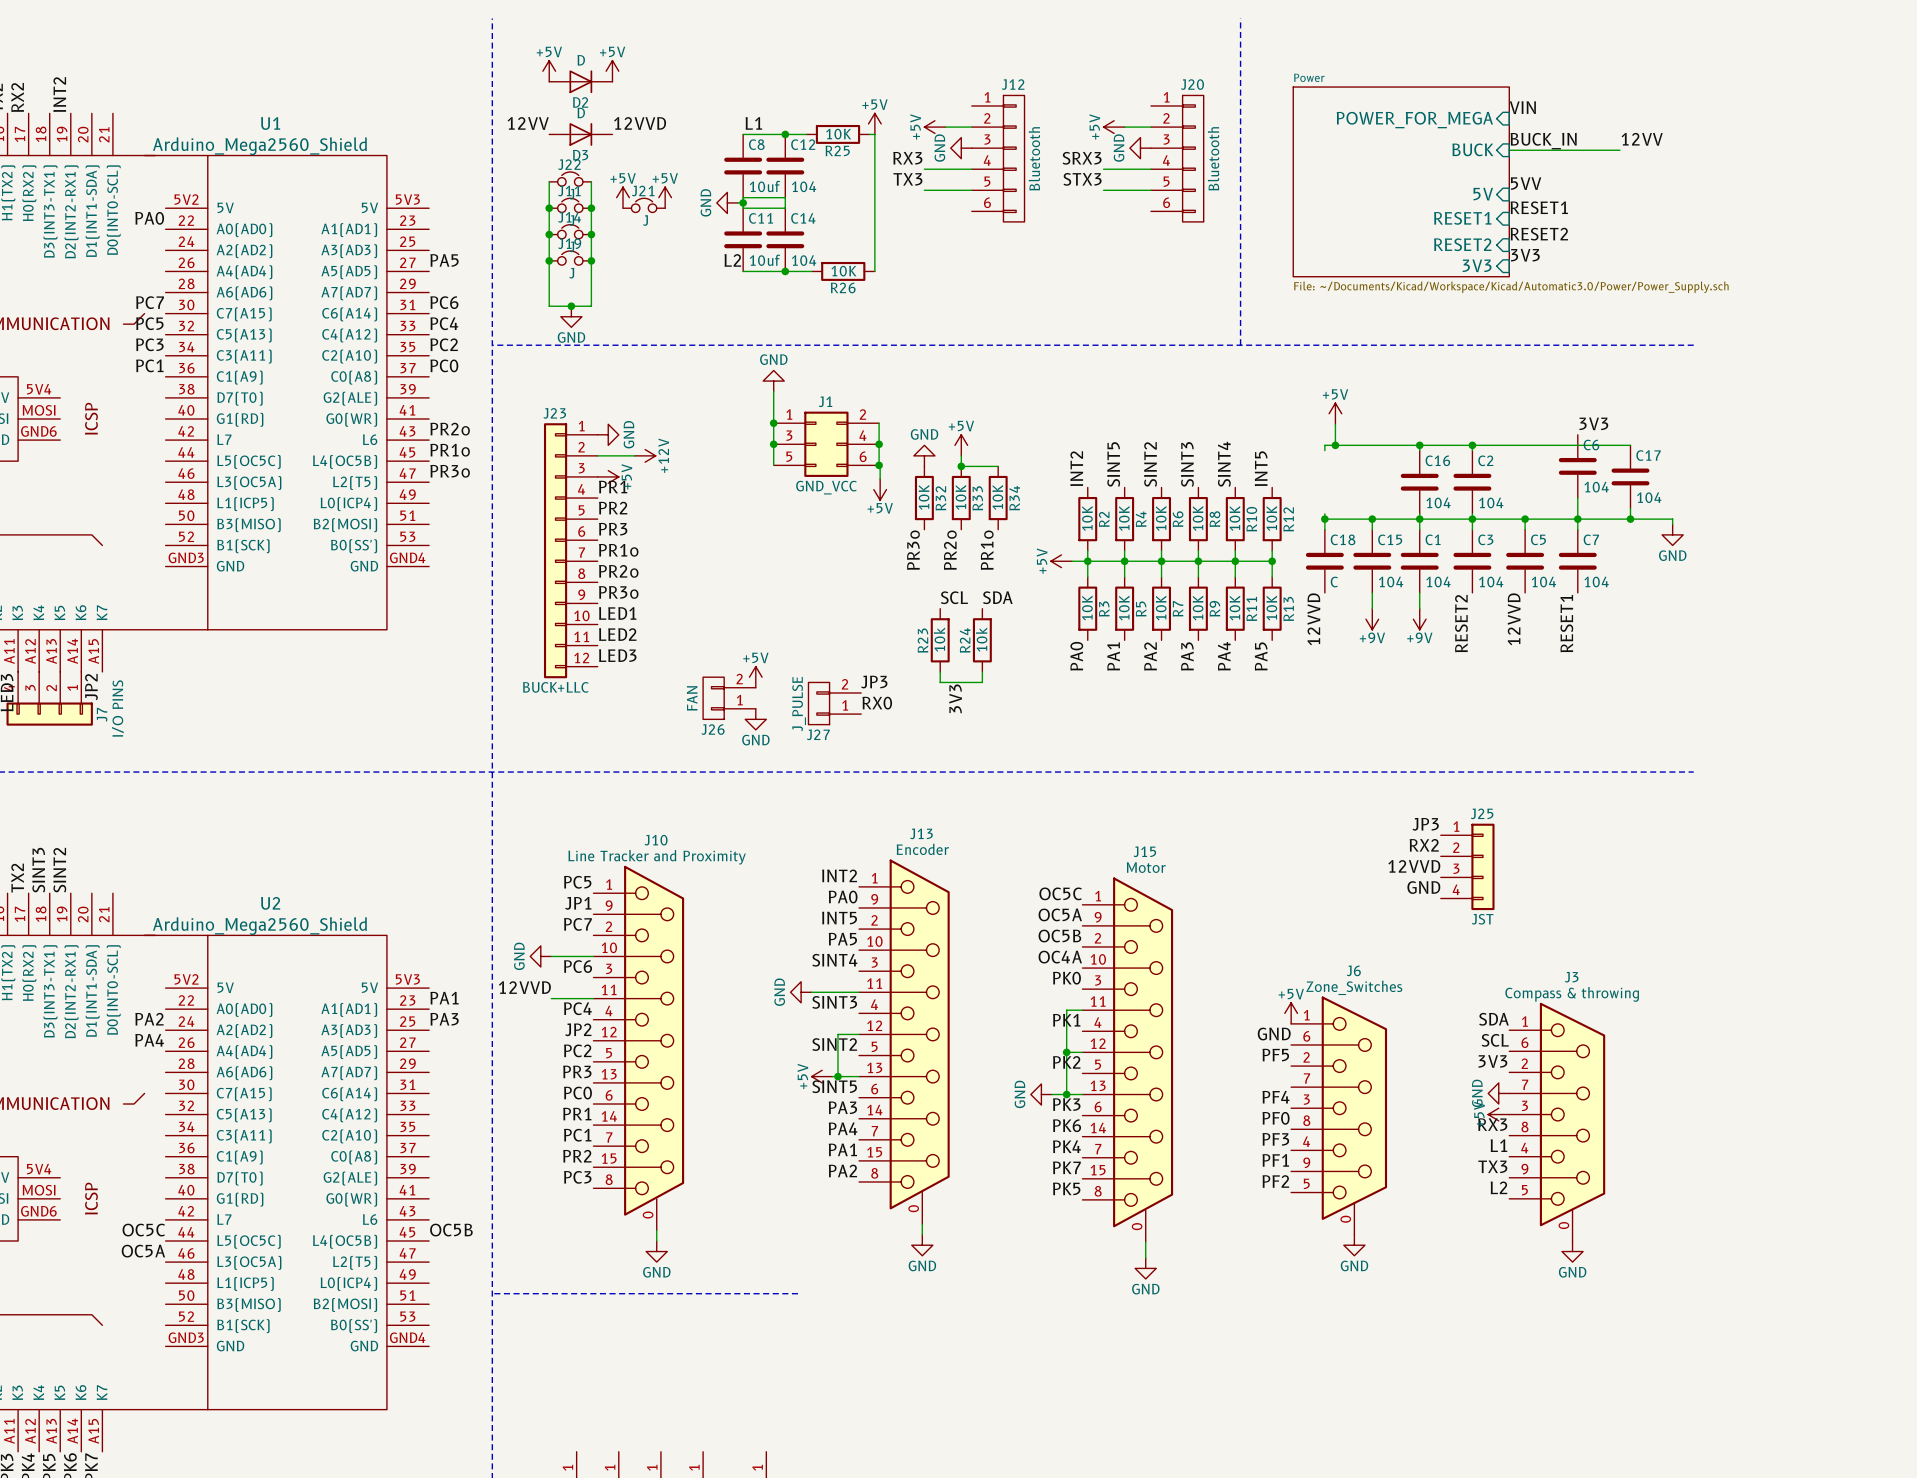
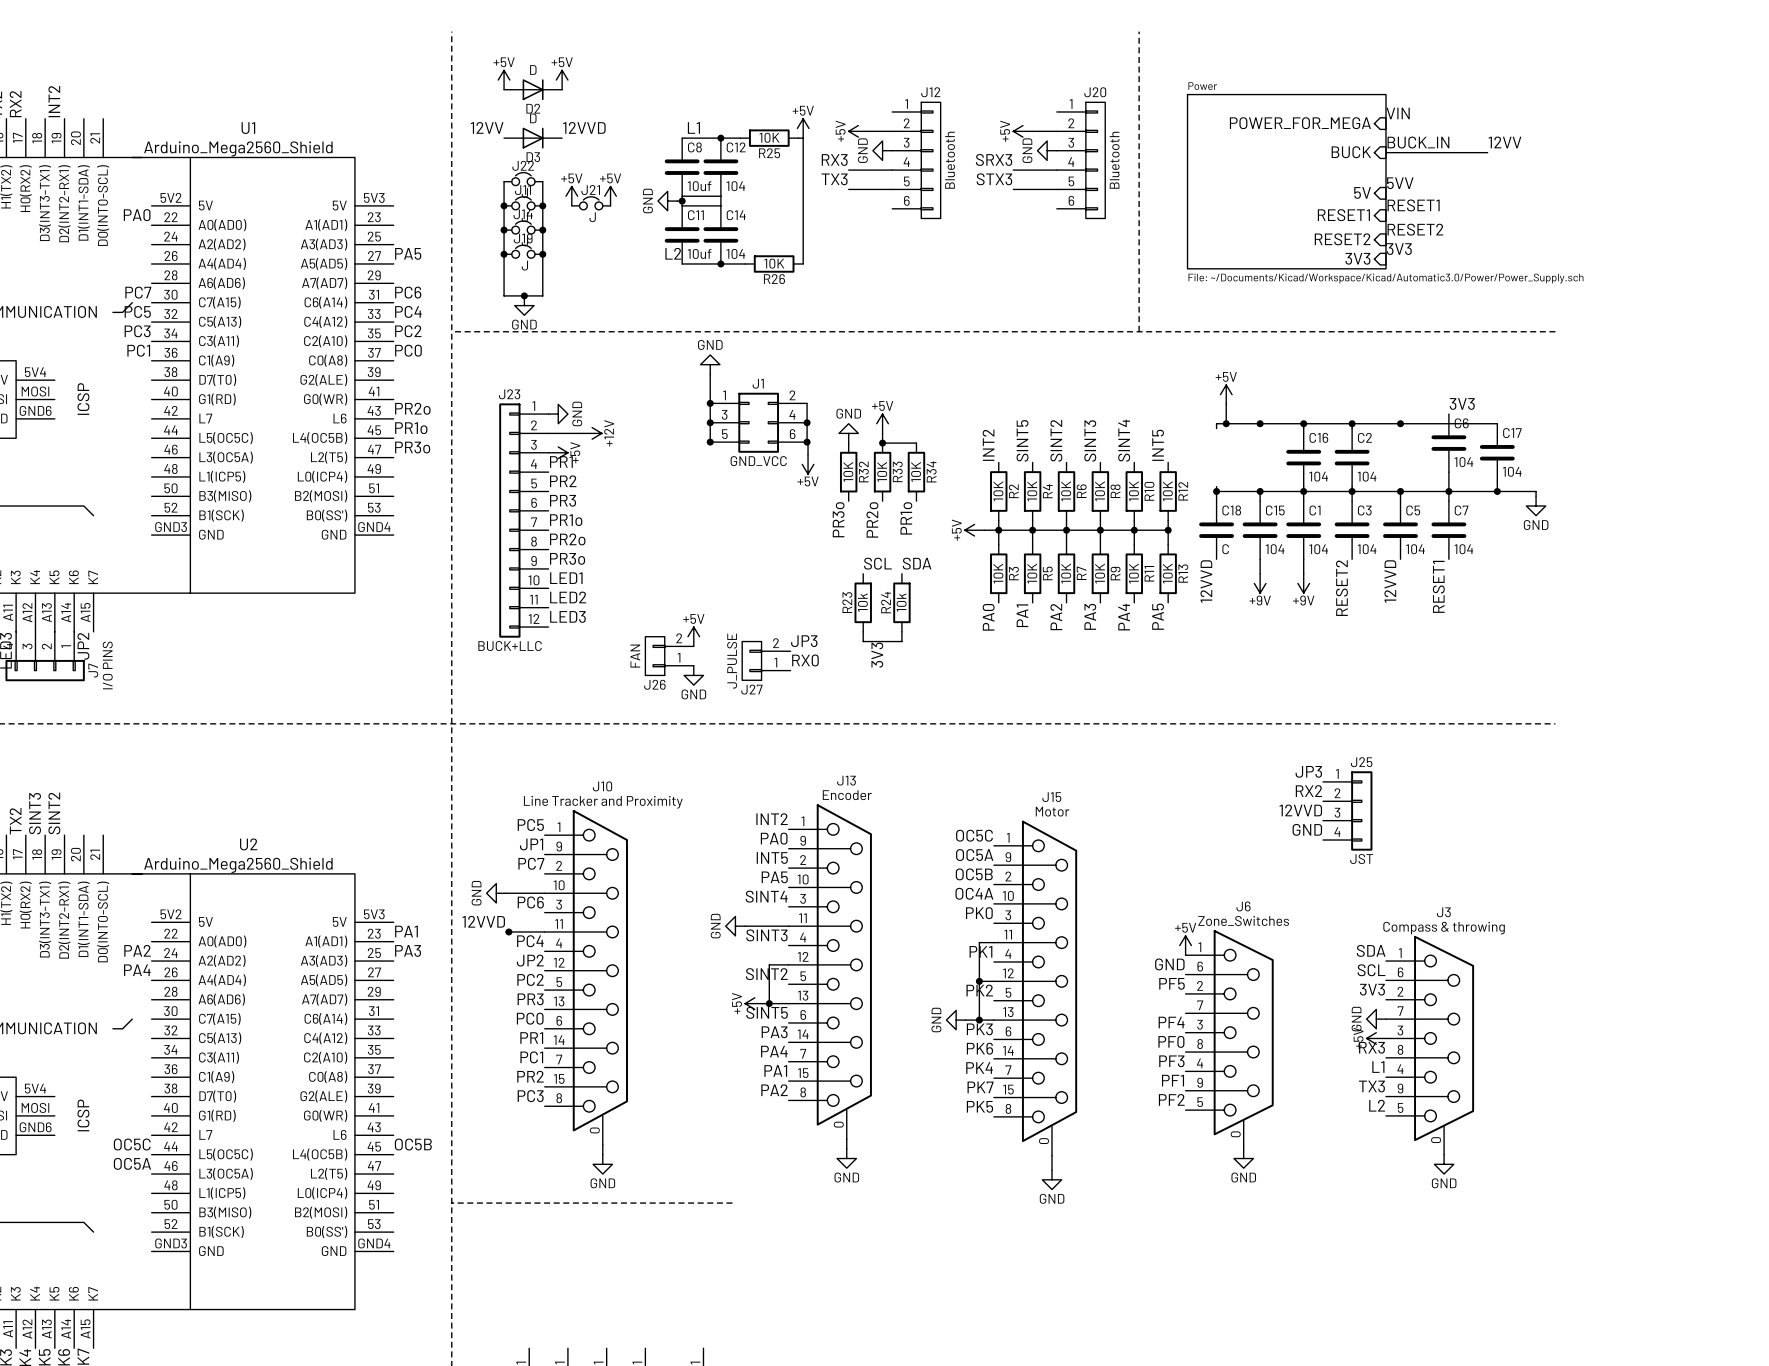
junction: none -> (1260, 423)
junction: none -> (1400, 423)
junction: none -> (710, 442)
junction: none -> (508, 931)

